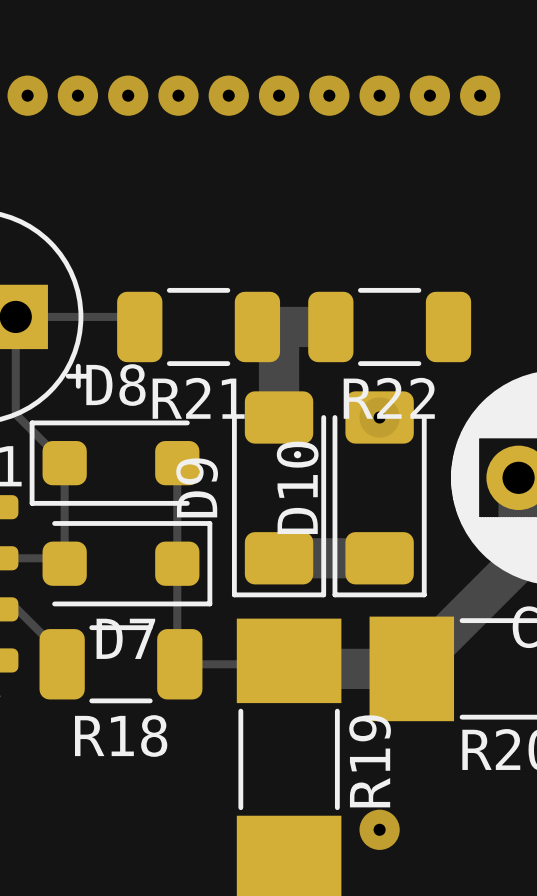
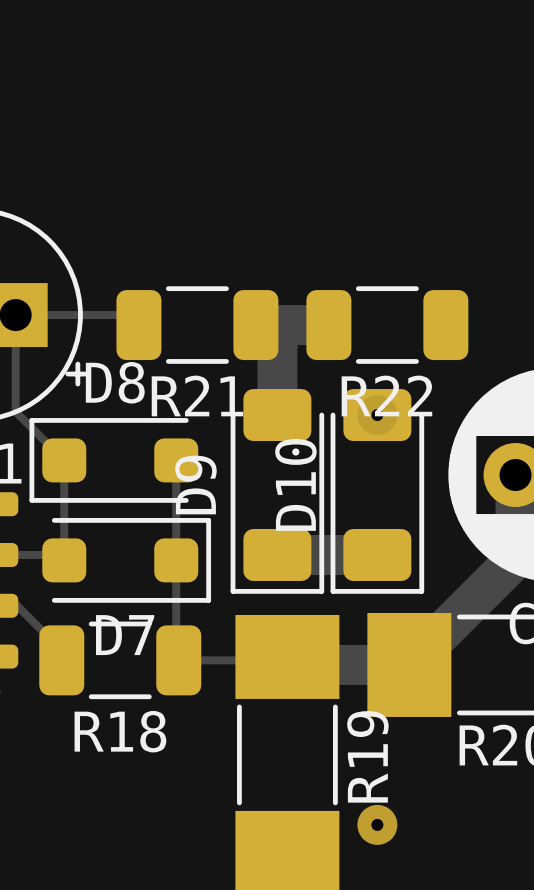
via: (27, 95) -> none
via: (77, 95) -> none
via: (128, 95) -> none
via: (178, 95) -> none
via: (228, 95) -> none
via: (279, 95) -> none
via: (329, 95) -> none
via: (379, 95) -> none
via: (429, 95) -> none
via: (480, 95) -> none

